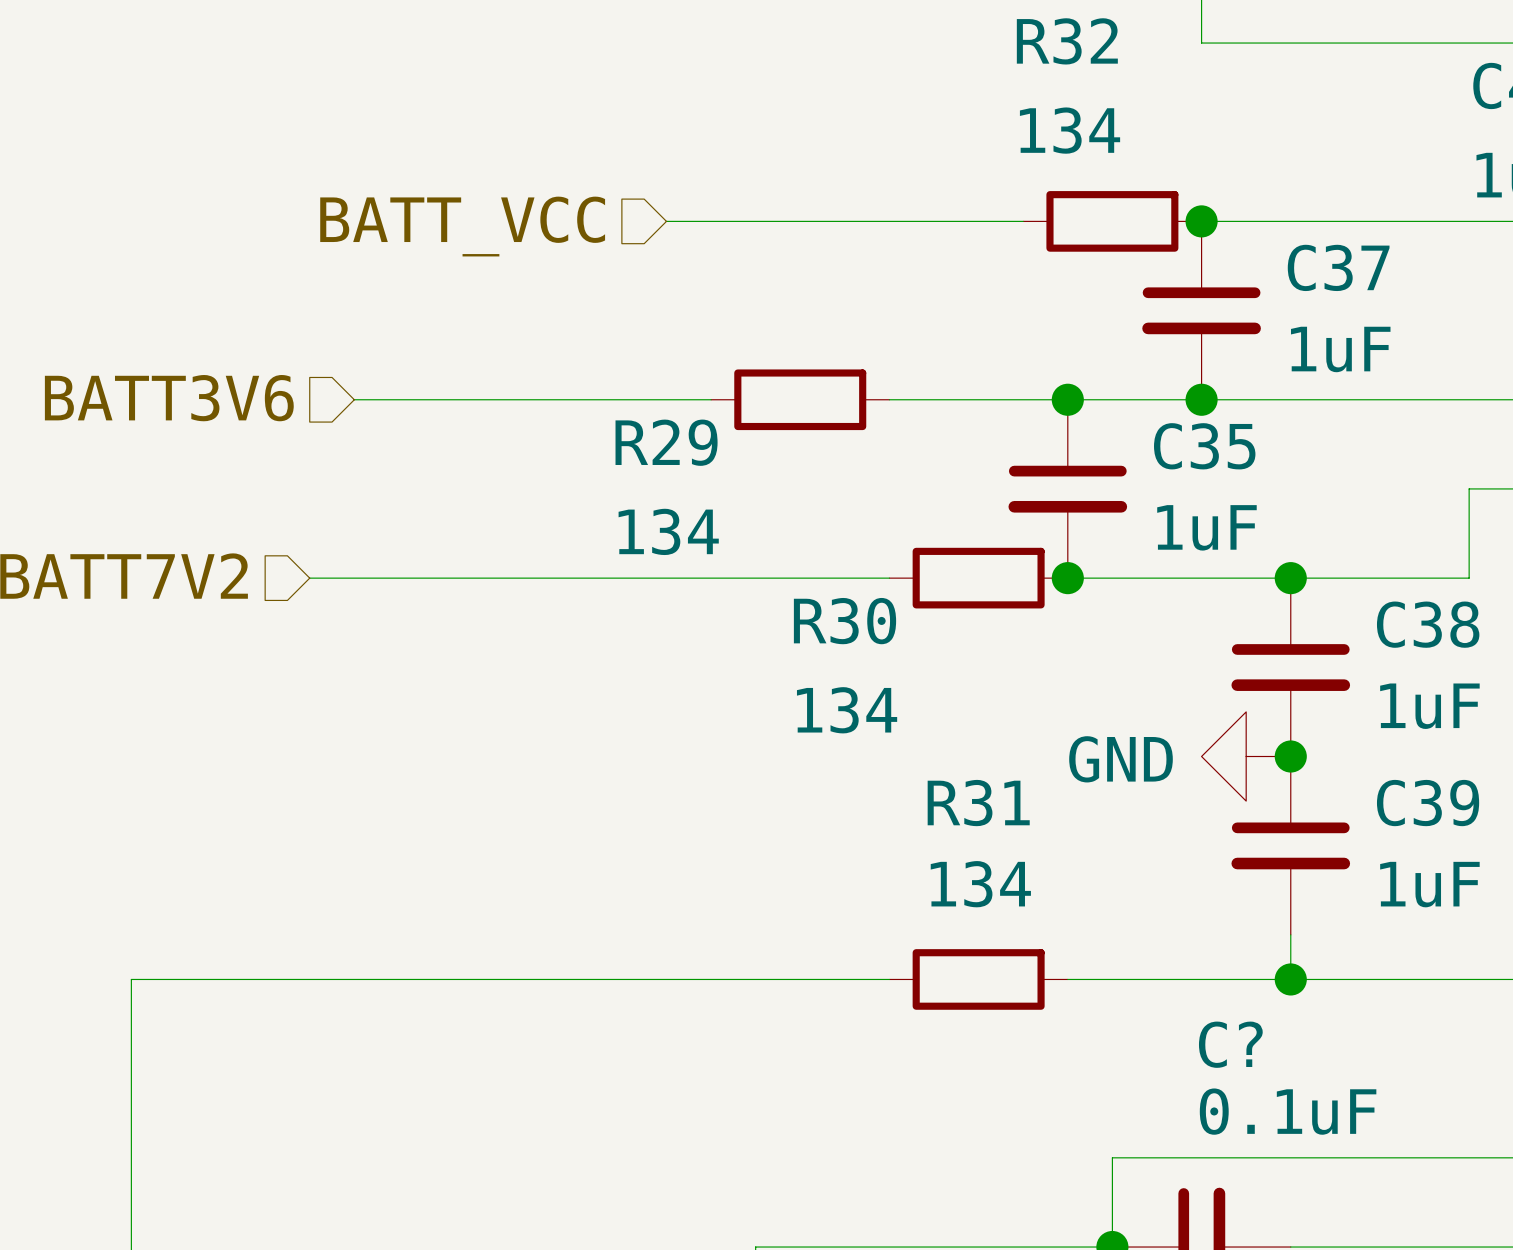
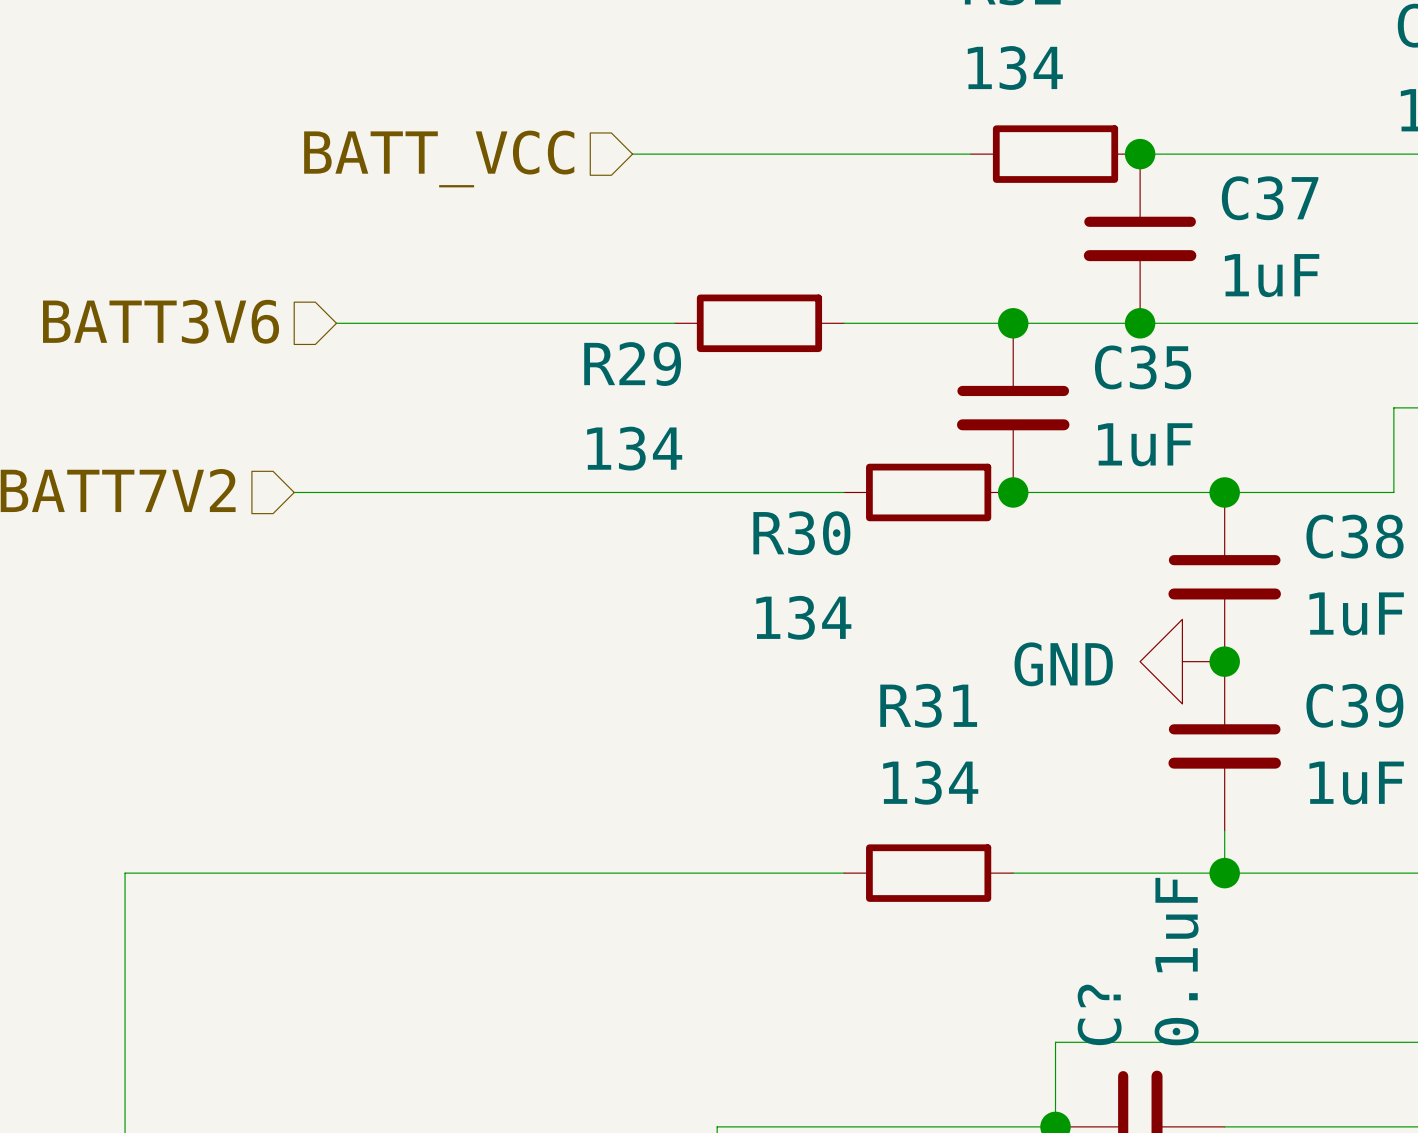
C? name rotation: 0° (1230, 1044) -> 90° counterclockwise (1099, 1014)
C? value rotation: 0° (1288, 1111) -> 90° counterclockwise (1176, 961)

